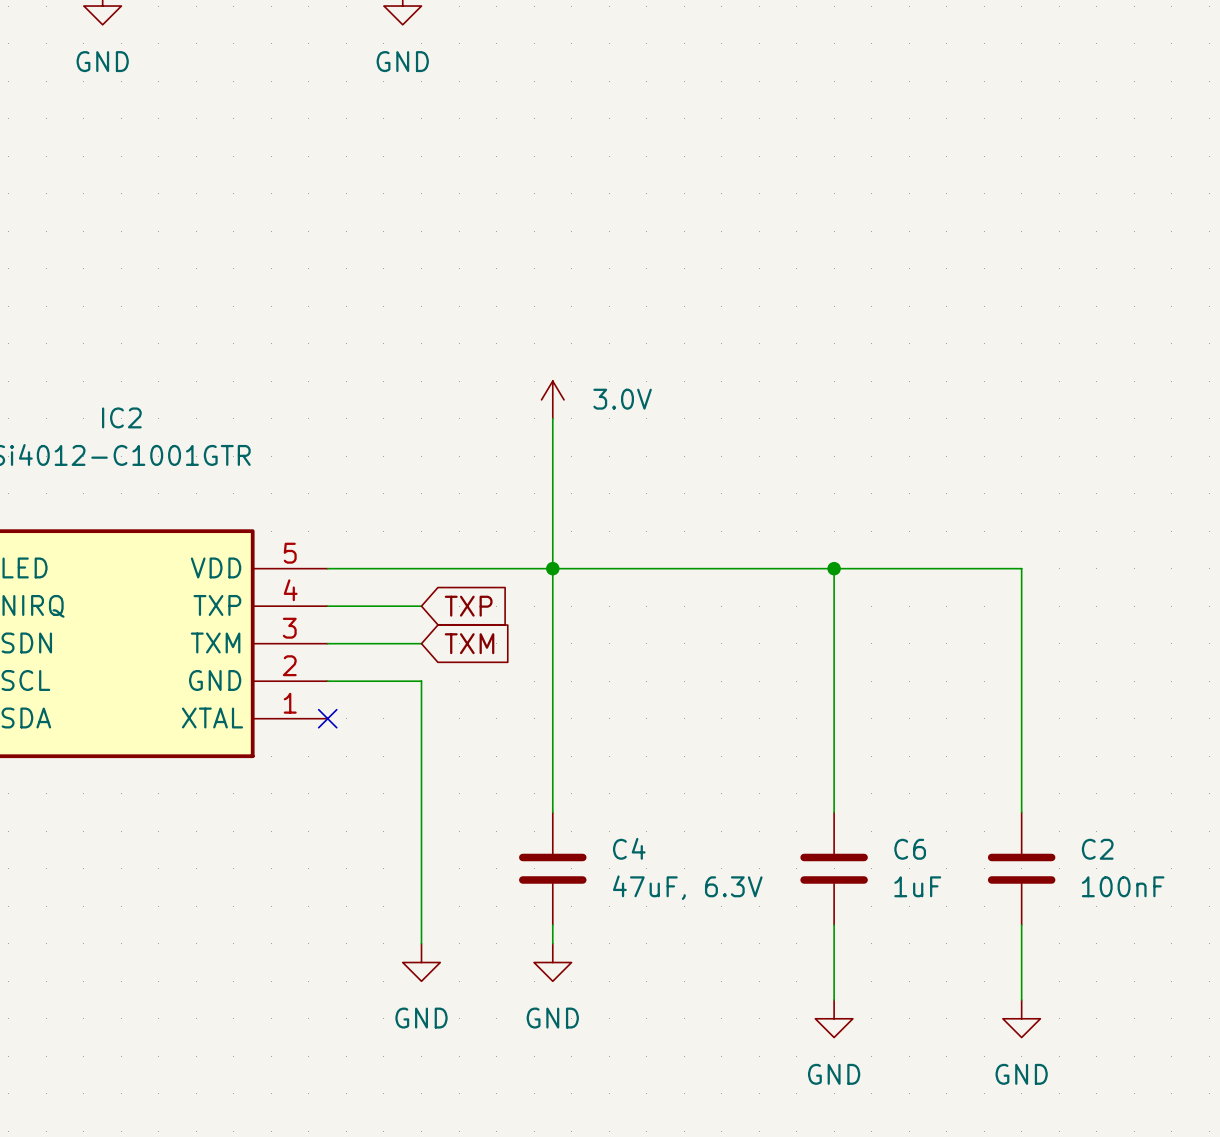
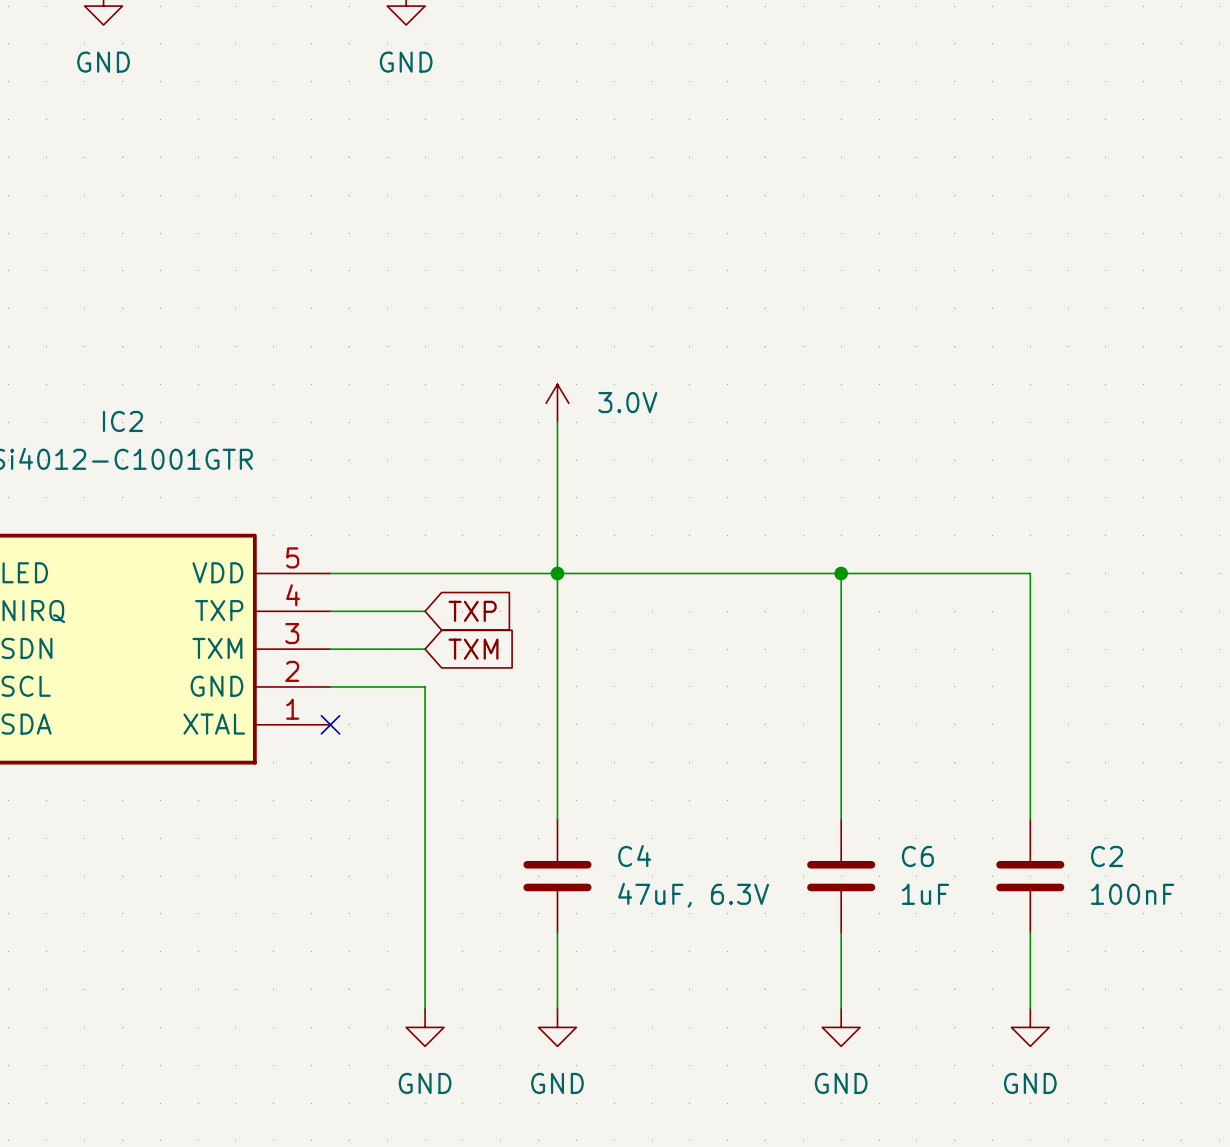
wire: none -> (425, 951) (425, 1008)
wire: none -> (557, 951) (557, 1008)
power symbol position: GND (421, 962) -> GND (425, 1027)
power symbol position: GND (552, 962) -> GND (557, 1027)

